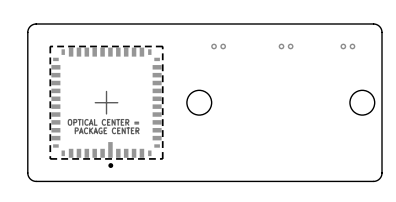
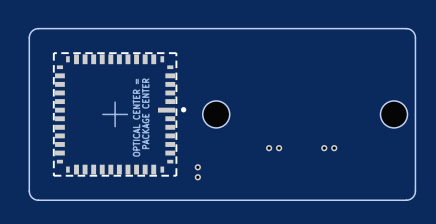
part: (218, 46) -> none
part: (286, 46) -> none
part: (347, 46) -> none
part rotation: 0° (106, 106) -> 90° counterclockwise (119, 114)
part: none -> (274, 148)
part: none -> (329, 148)
part: none -> (197, 172)

